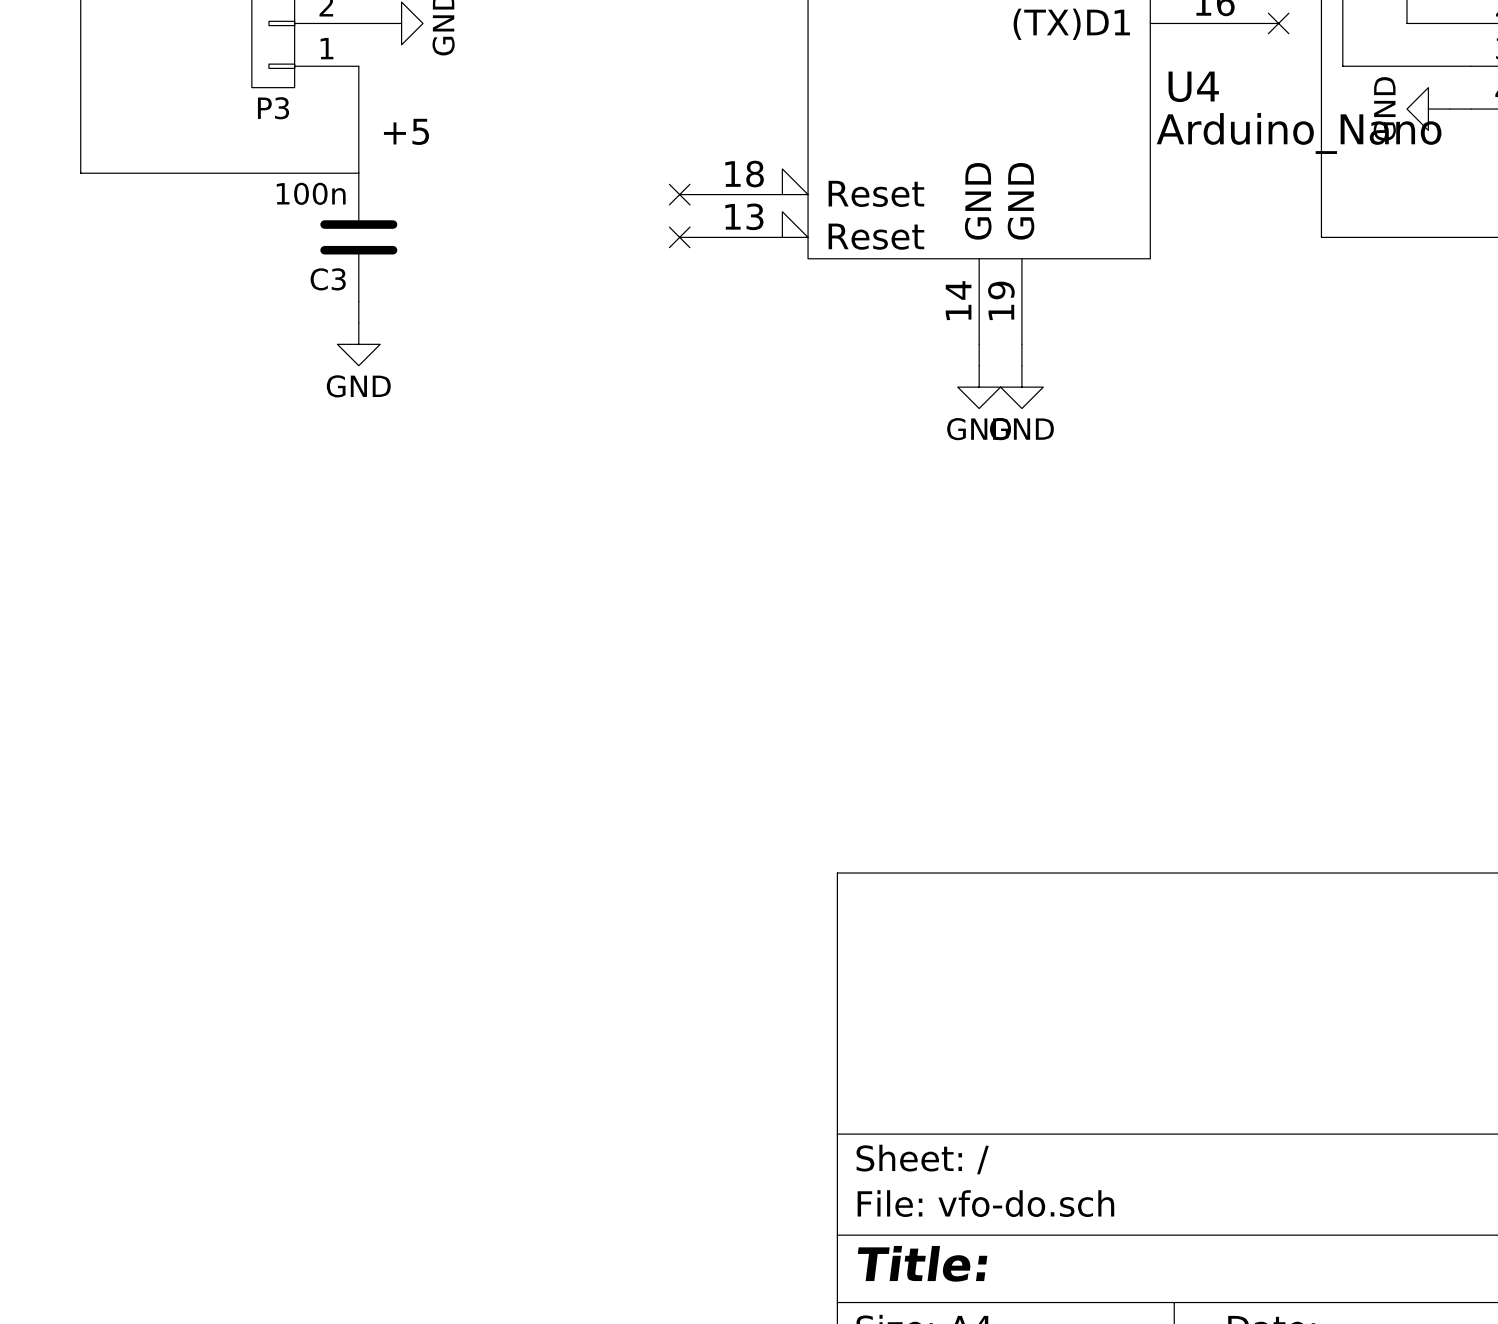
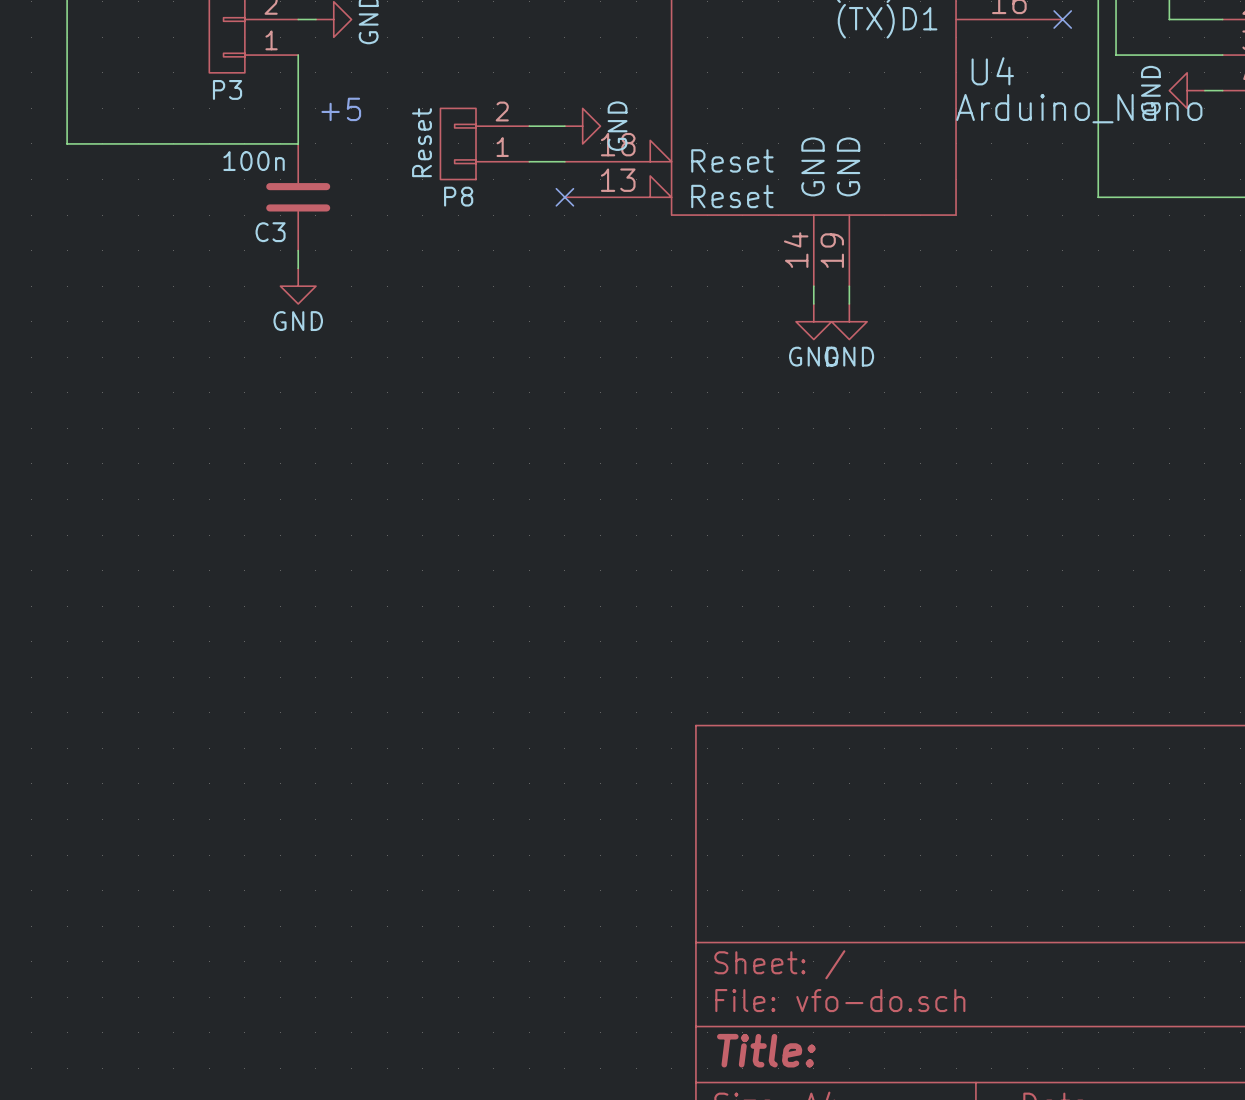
wire: none -> (529, 126) (564, 126)
power symbol: none -> GND (582, 126)
P8: none -> Reset (484, 143)
wire: none -> (529, 161) (564, 161)
no-connect mark: (679, 194) -> none

